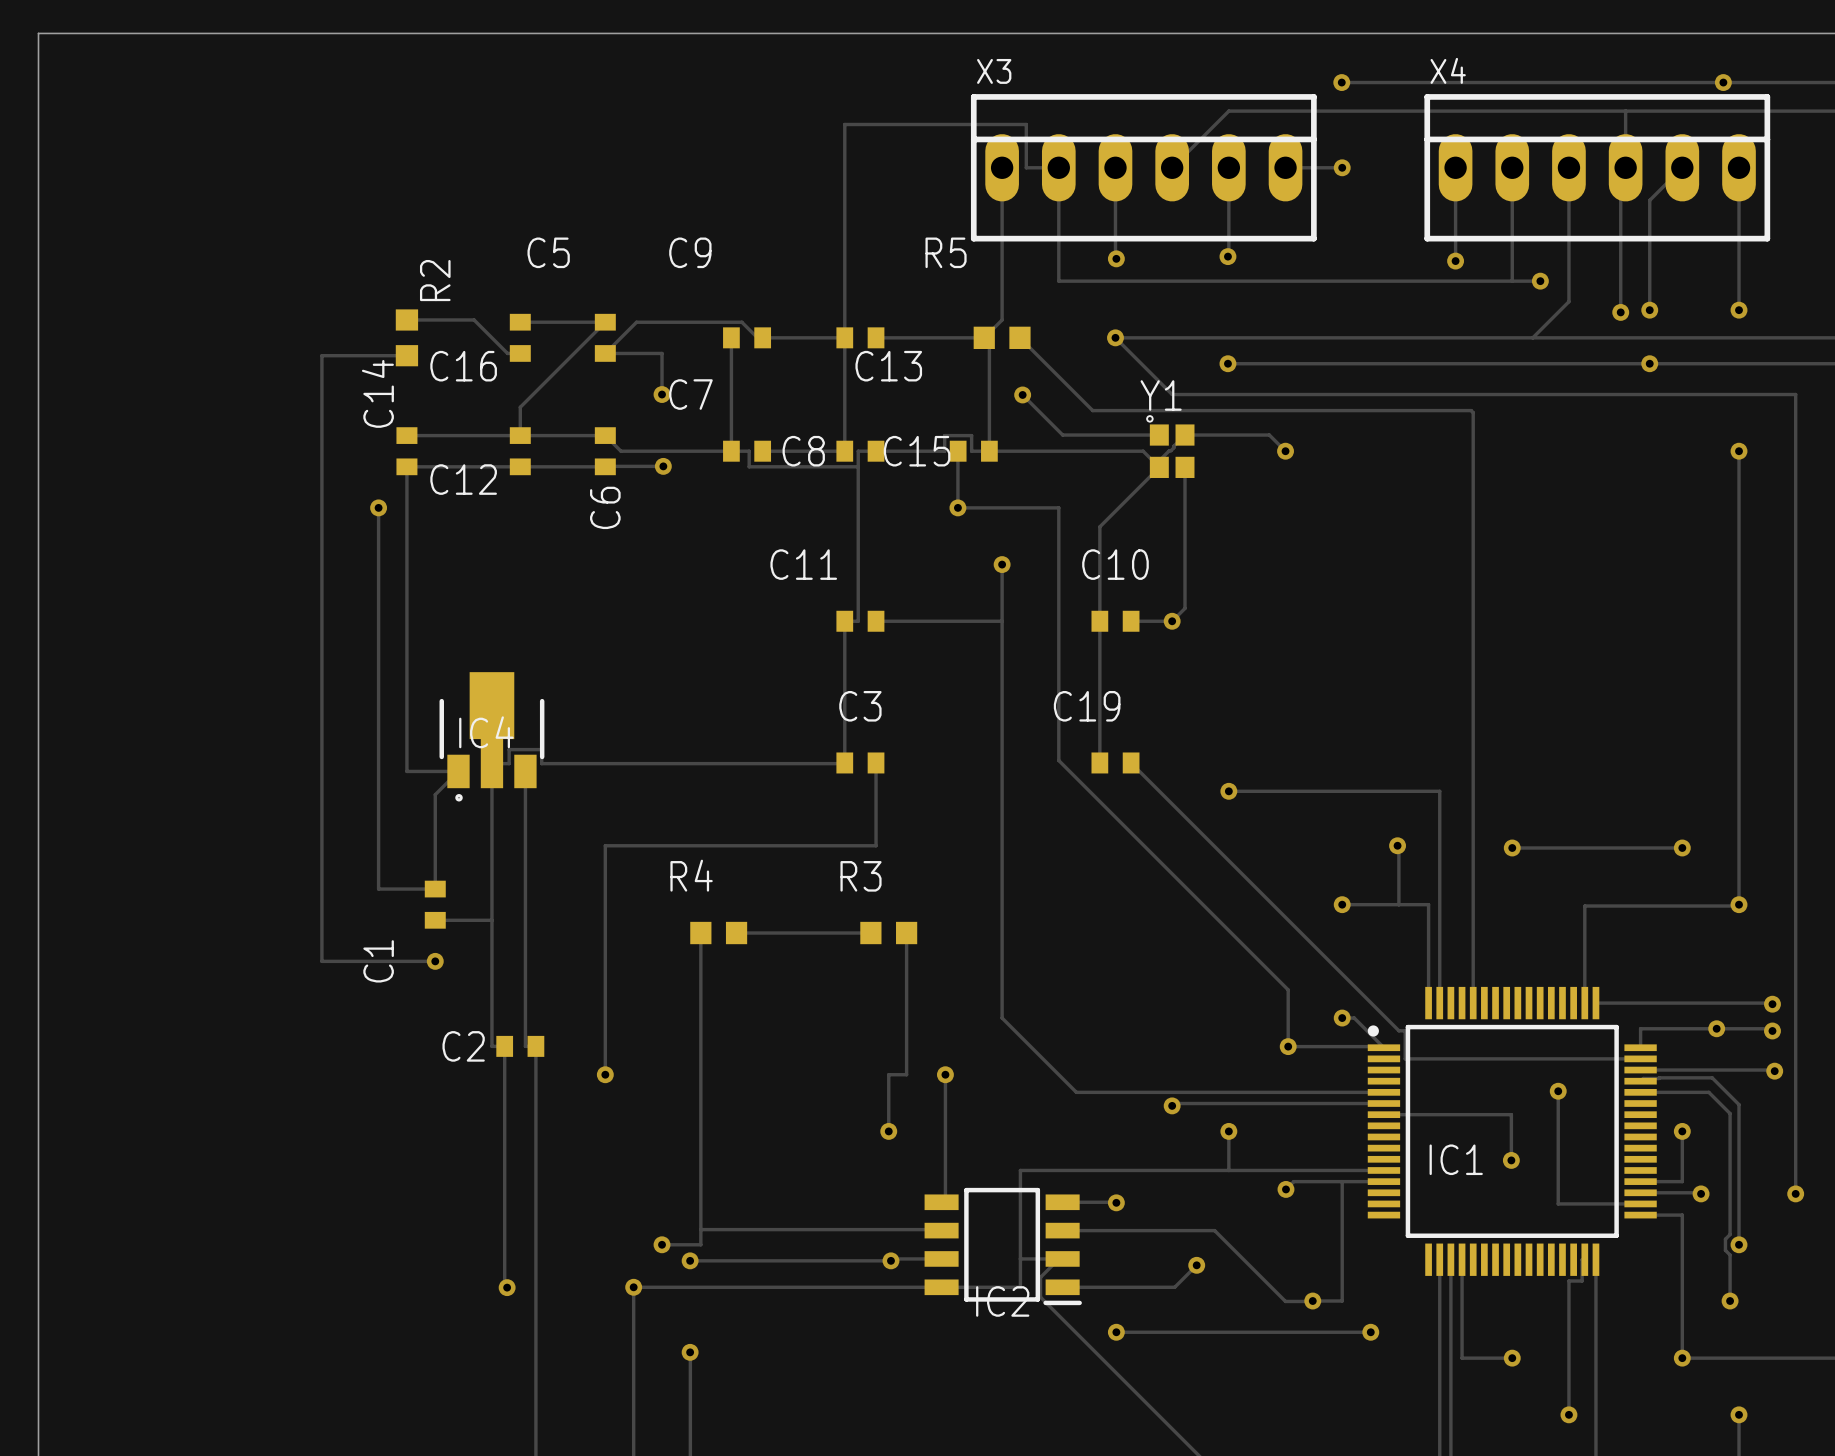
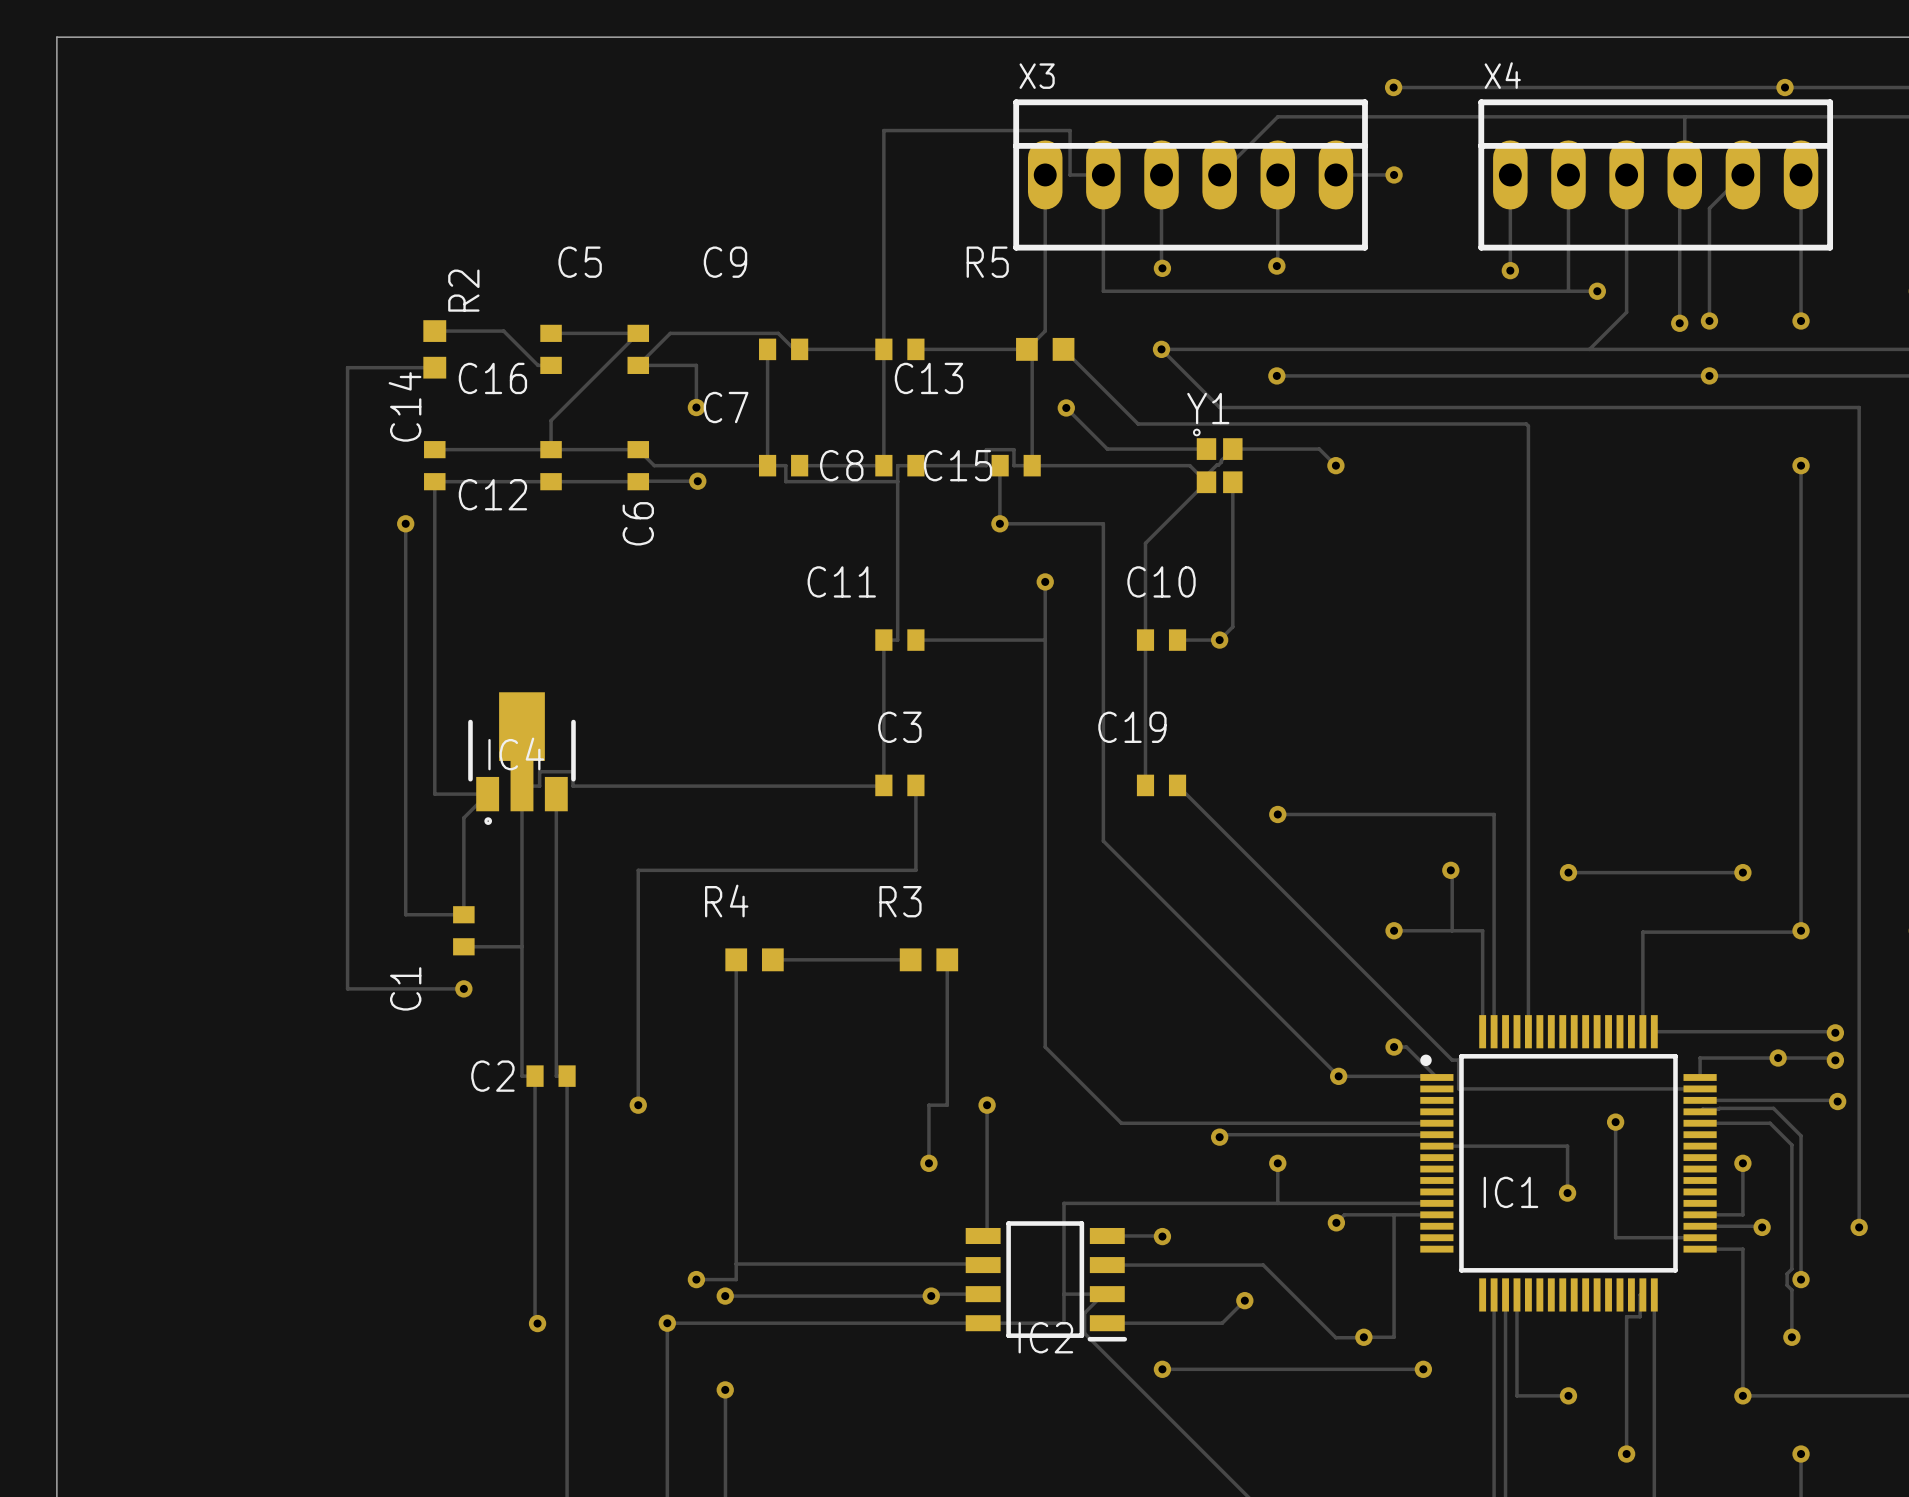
track: (1058, 760) (1288, 989) (1288, 1046) -> (1103, 782) (1103, 841) (1338, 1076)

